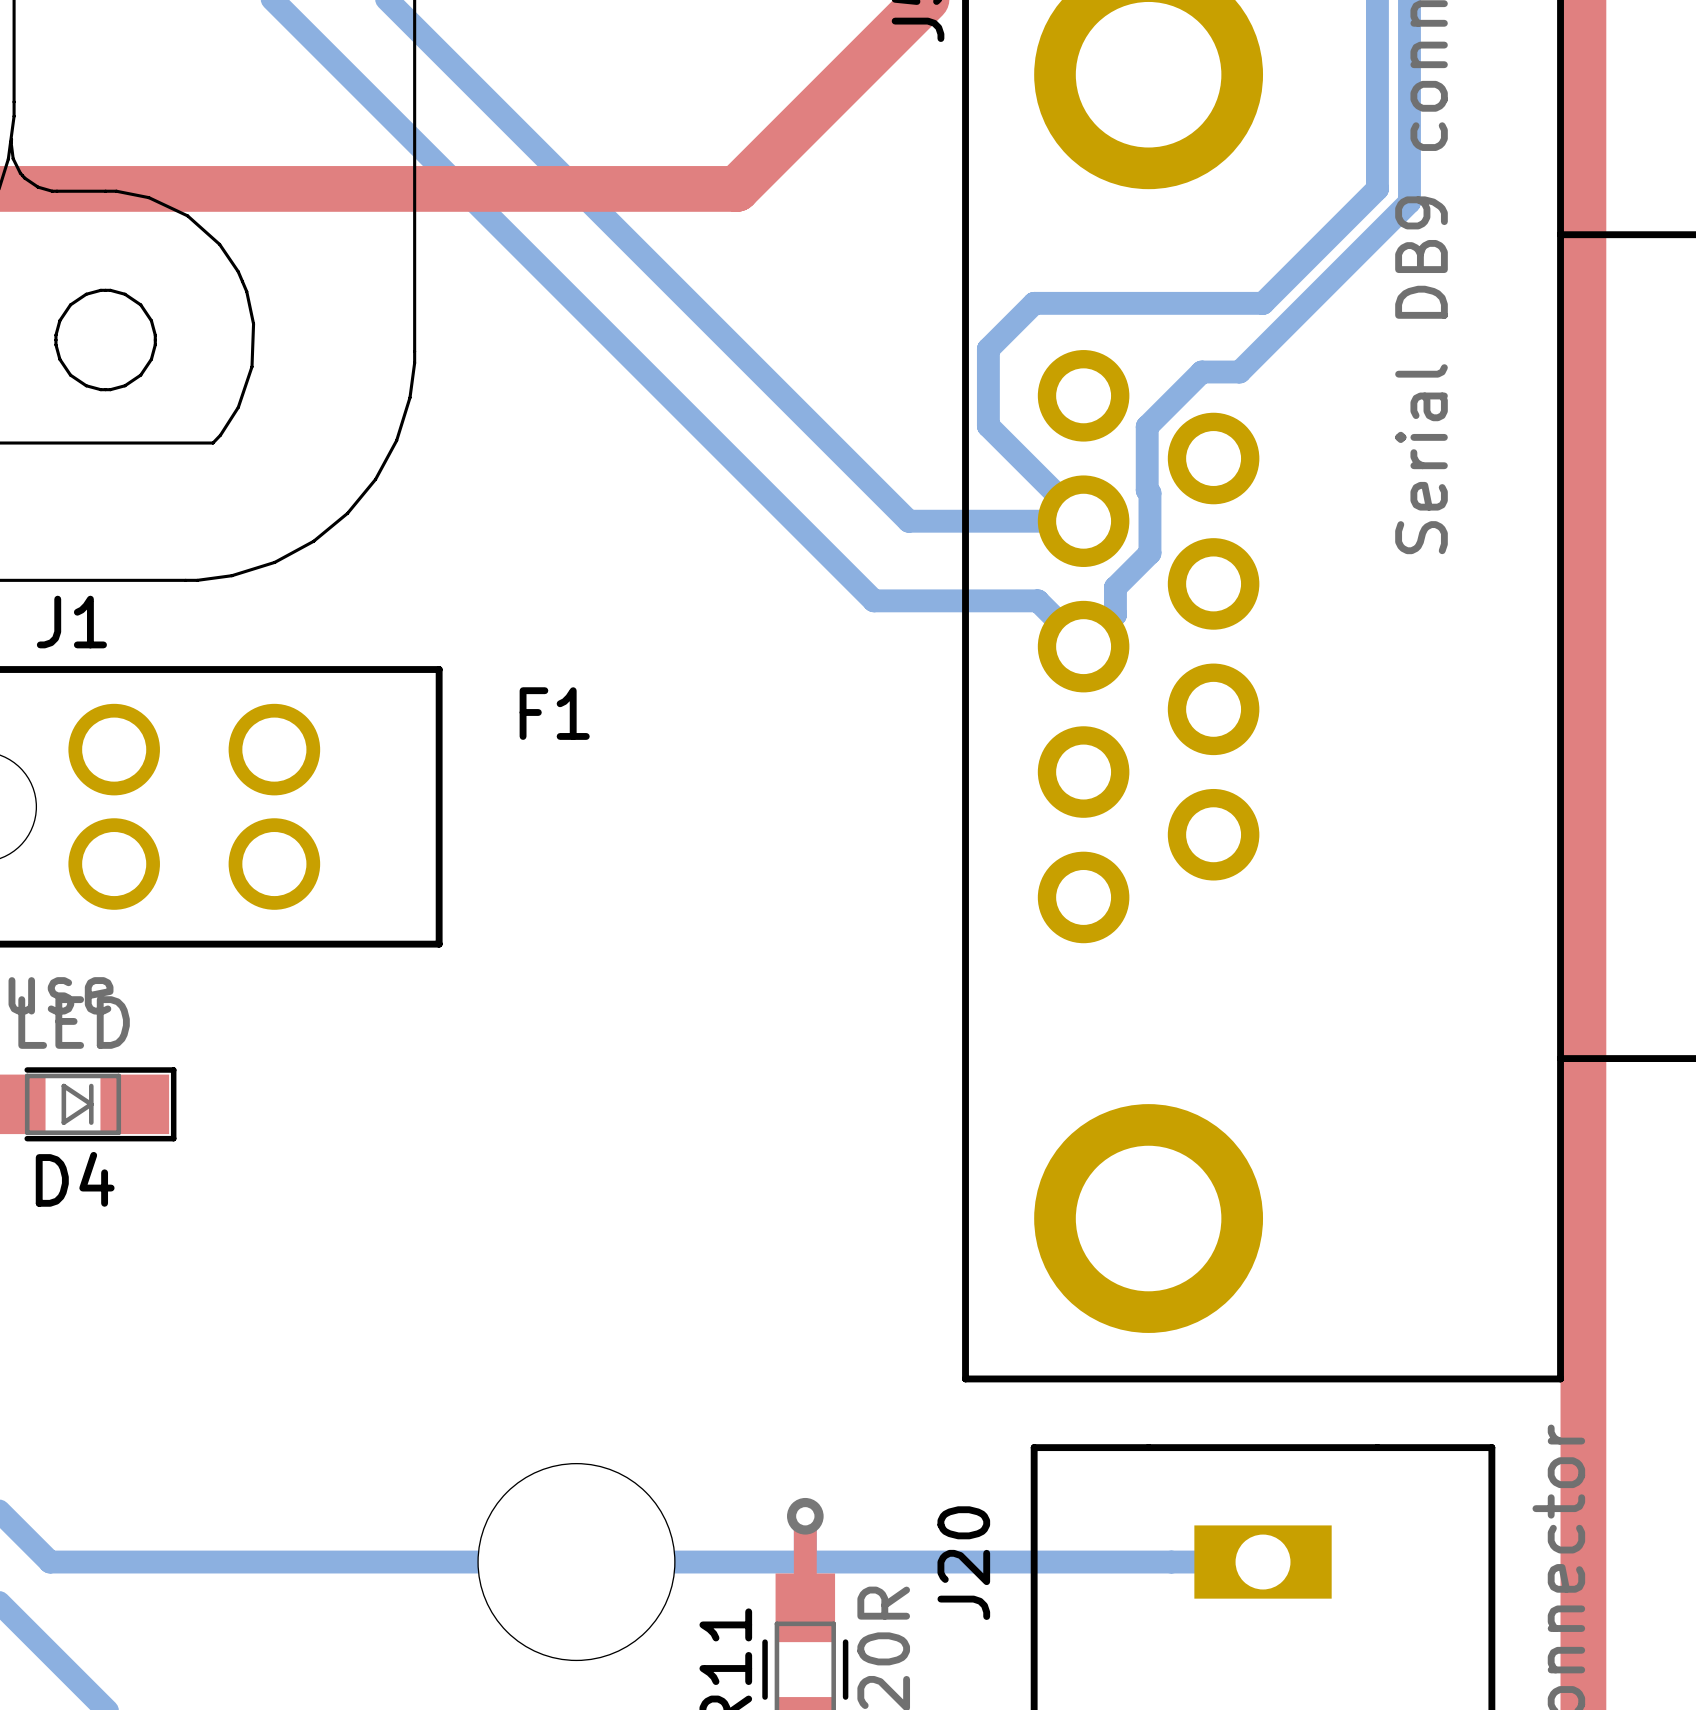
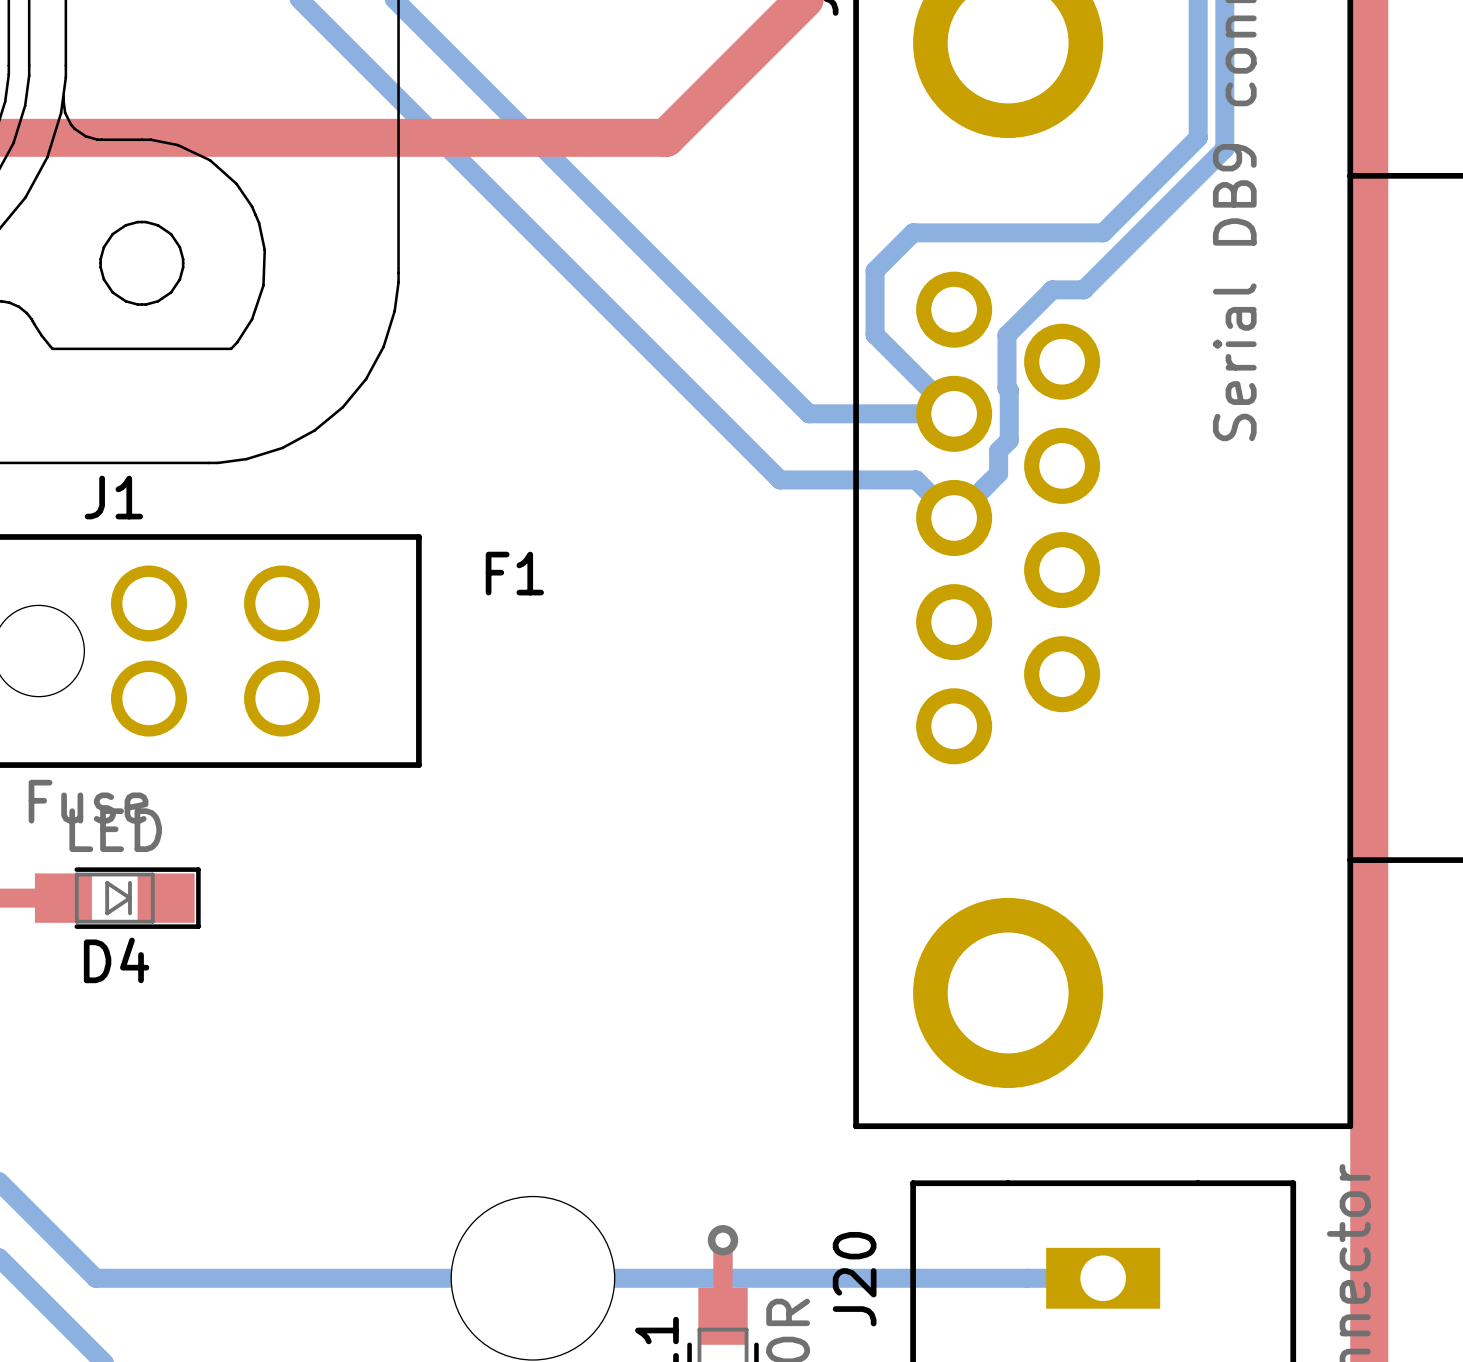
bottom track: (1137, 565) (1115, 587) (1115, 614) -> (998, 450) (998, 473) (980, 491)

